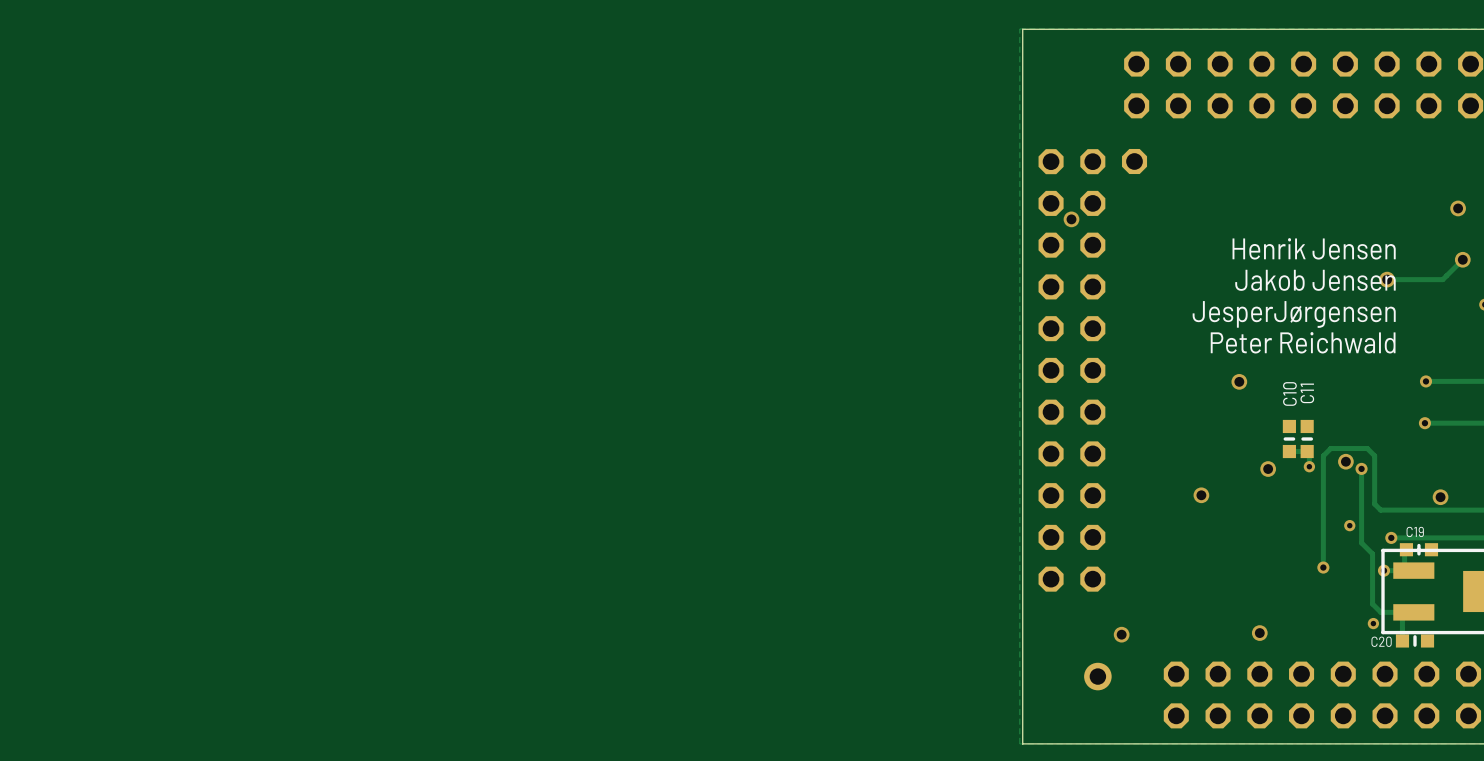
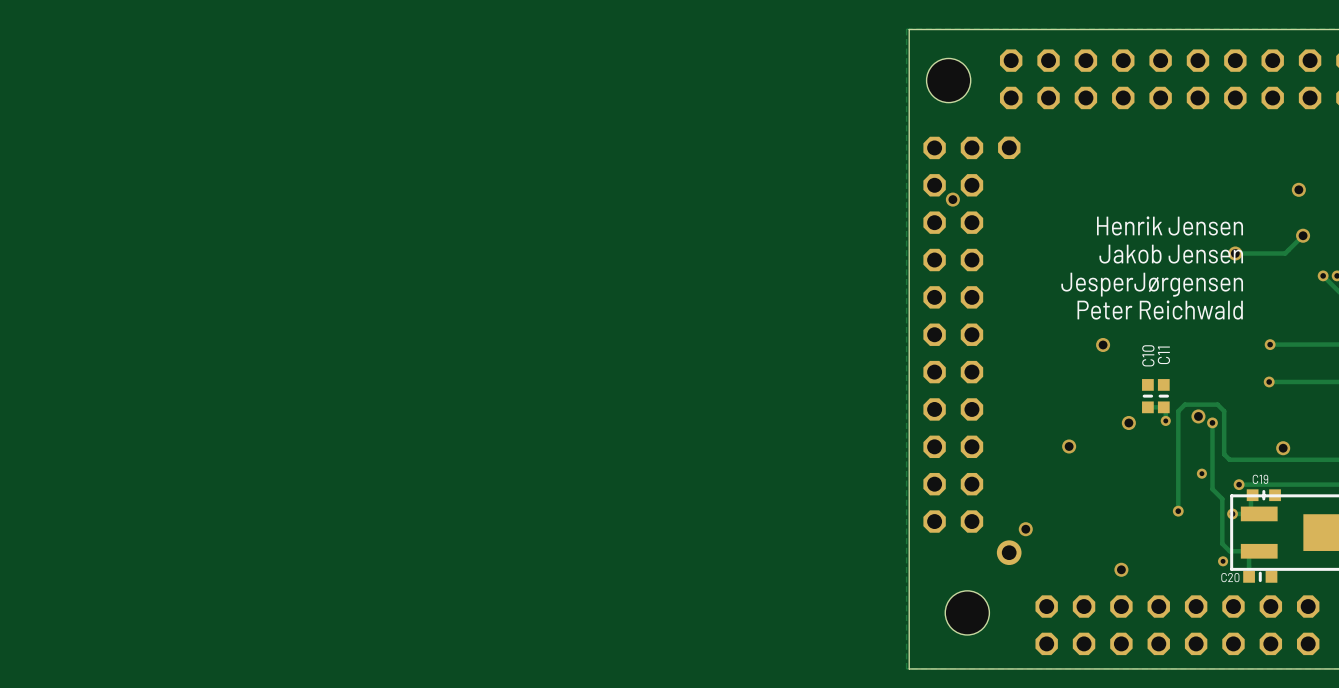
hole: none -> (948, 80)
via position: (1121, 634) -> (1025, 529)
part position: (1097, 676) -> (1009, 552)
hole: none -> (967, 612)

